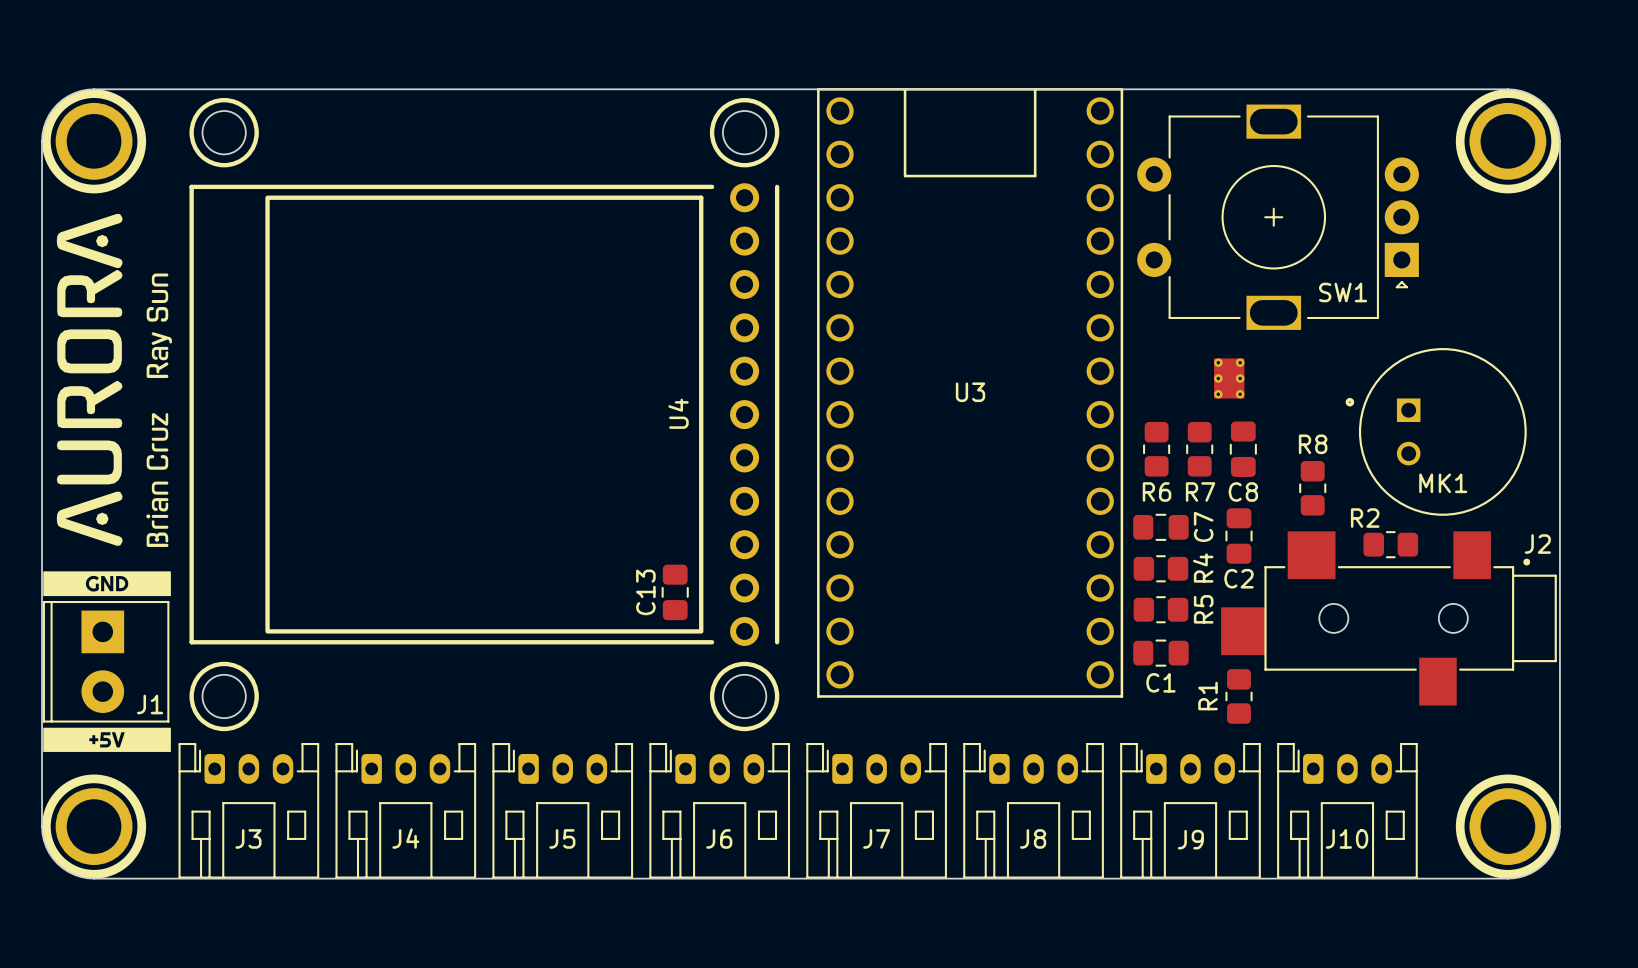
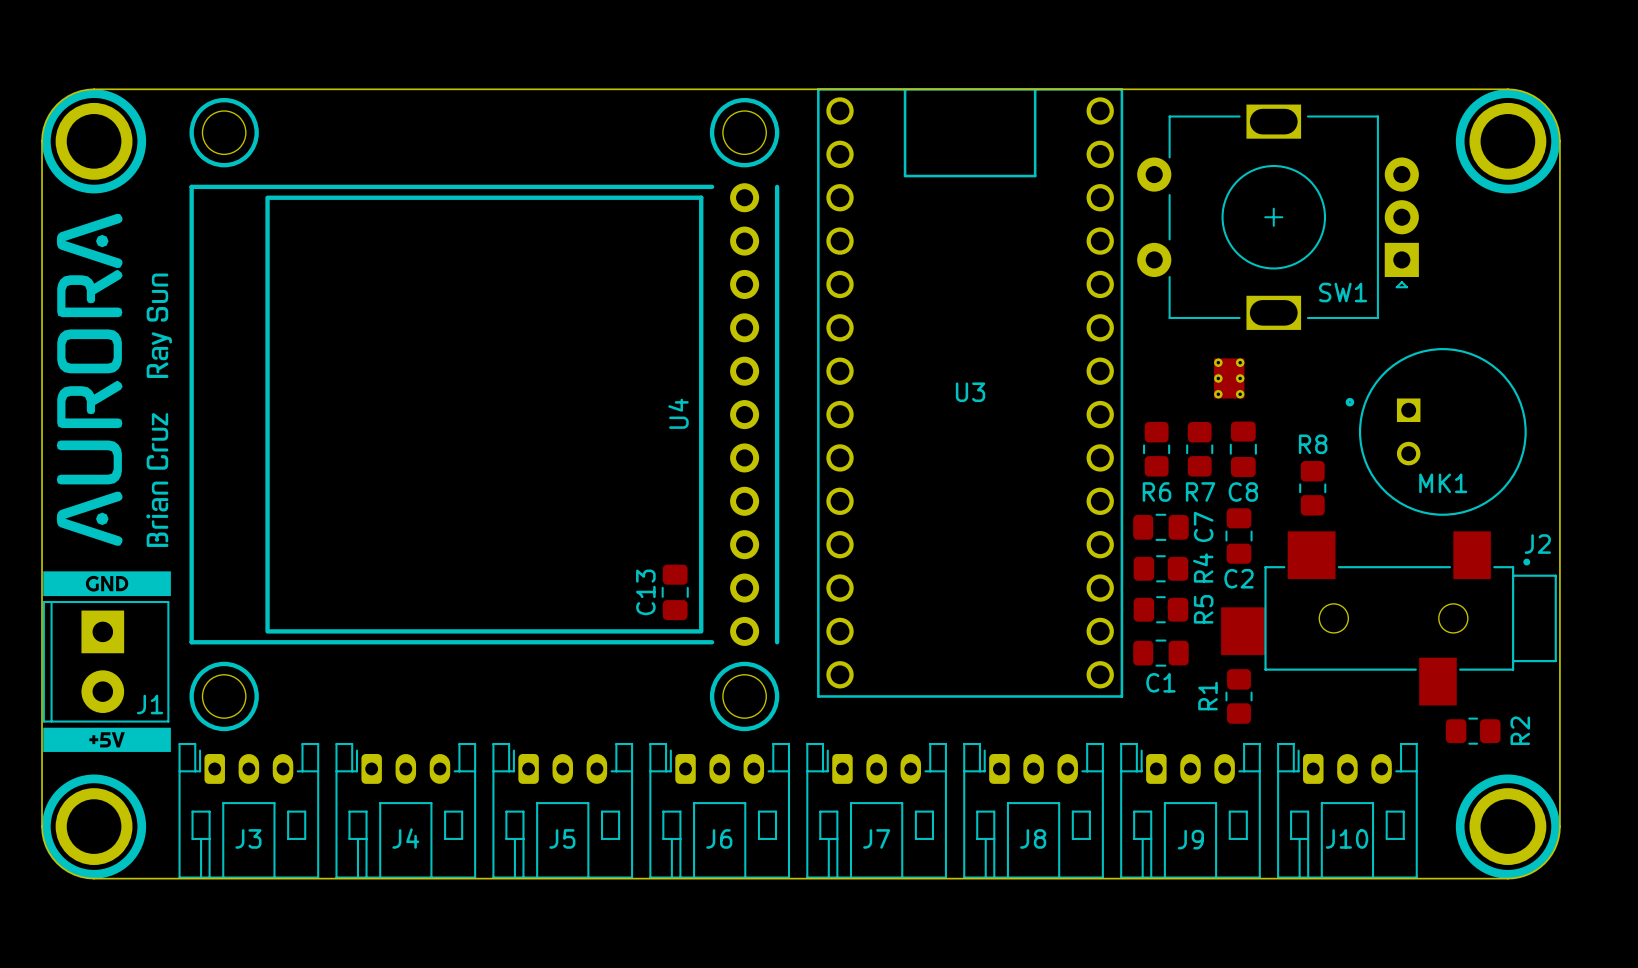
R2 name rotation: 0° (1365, 518) -> 90° counterclockwise (1520, 730)
R2 name position: R2 (1365, 518) -> R2 (1520, 730)
R2 position: (1390, 544) -> (1473, 731)

